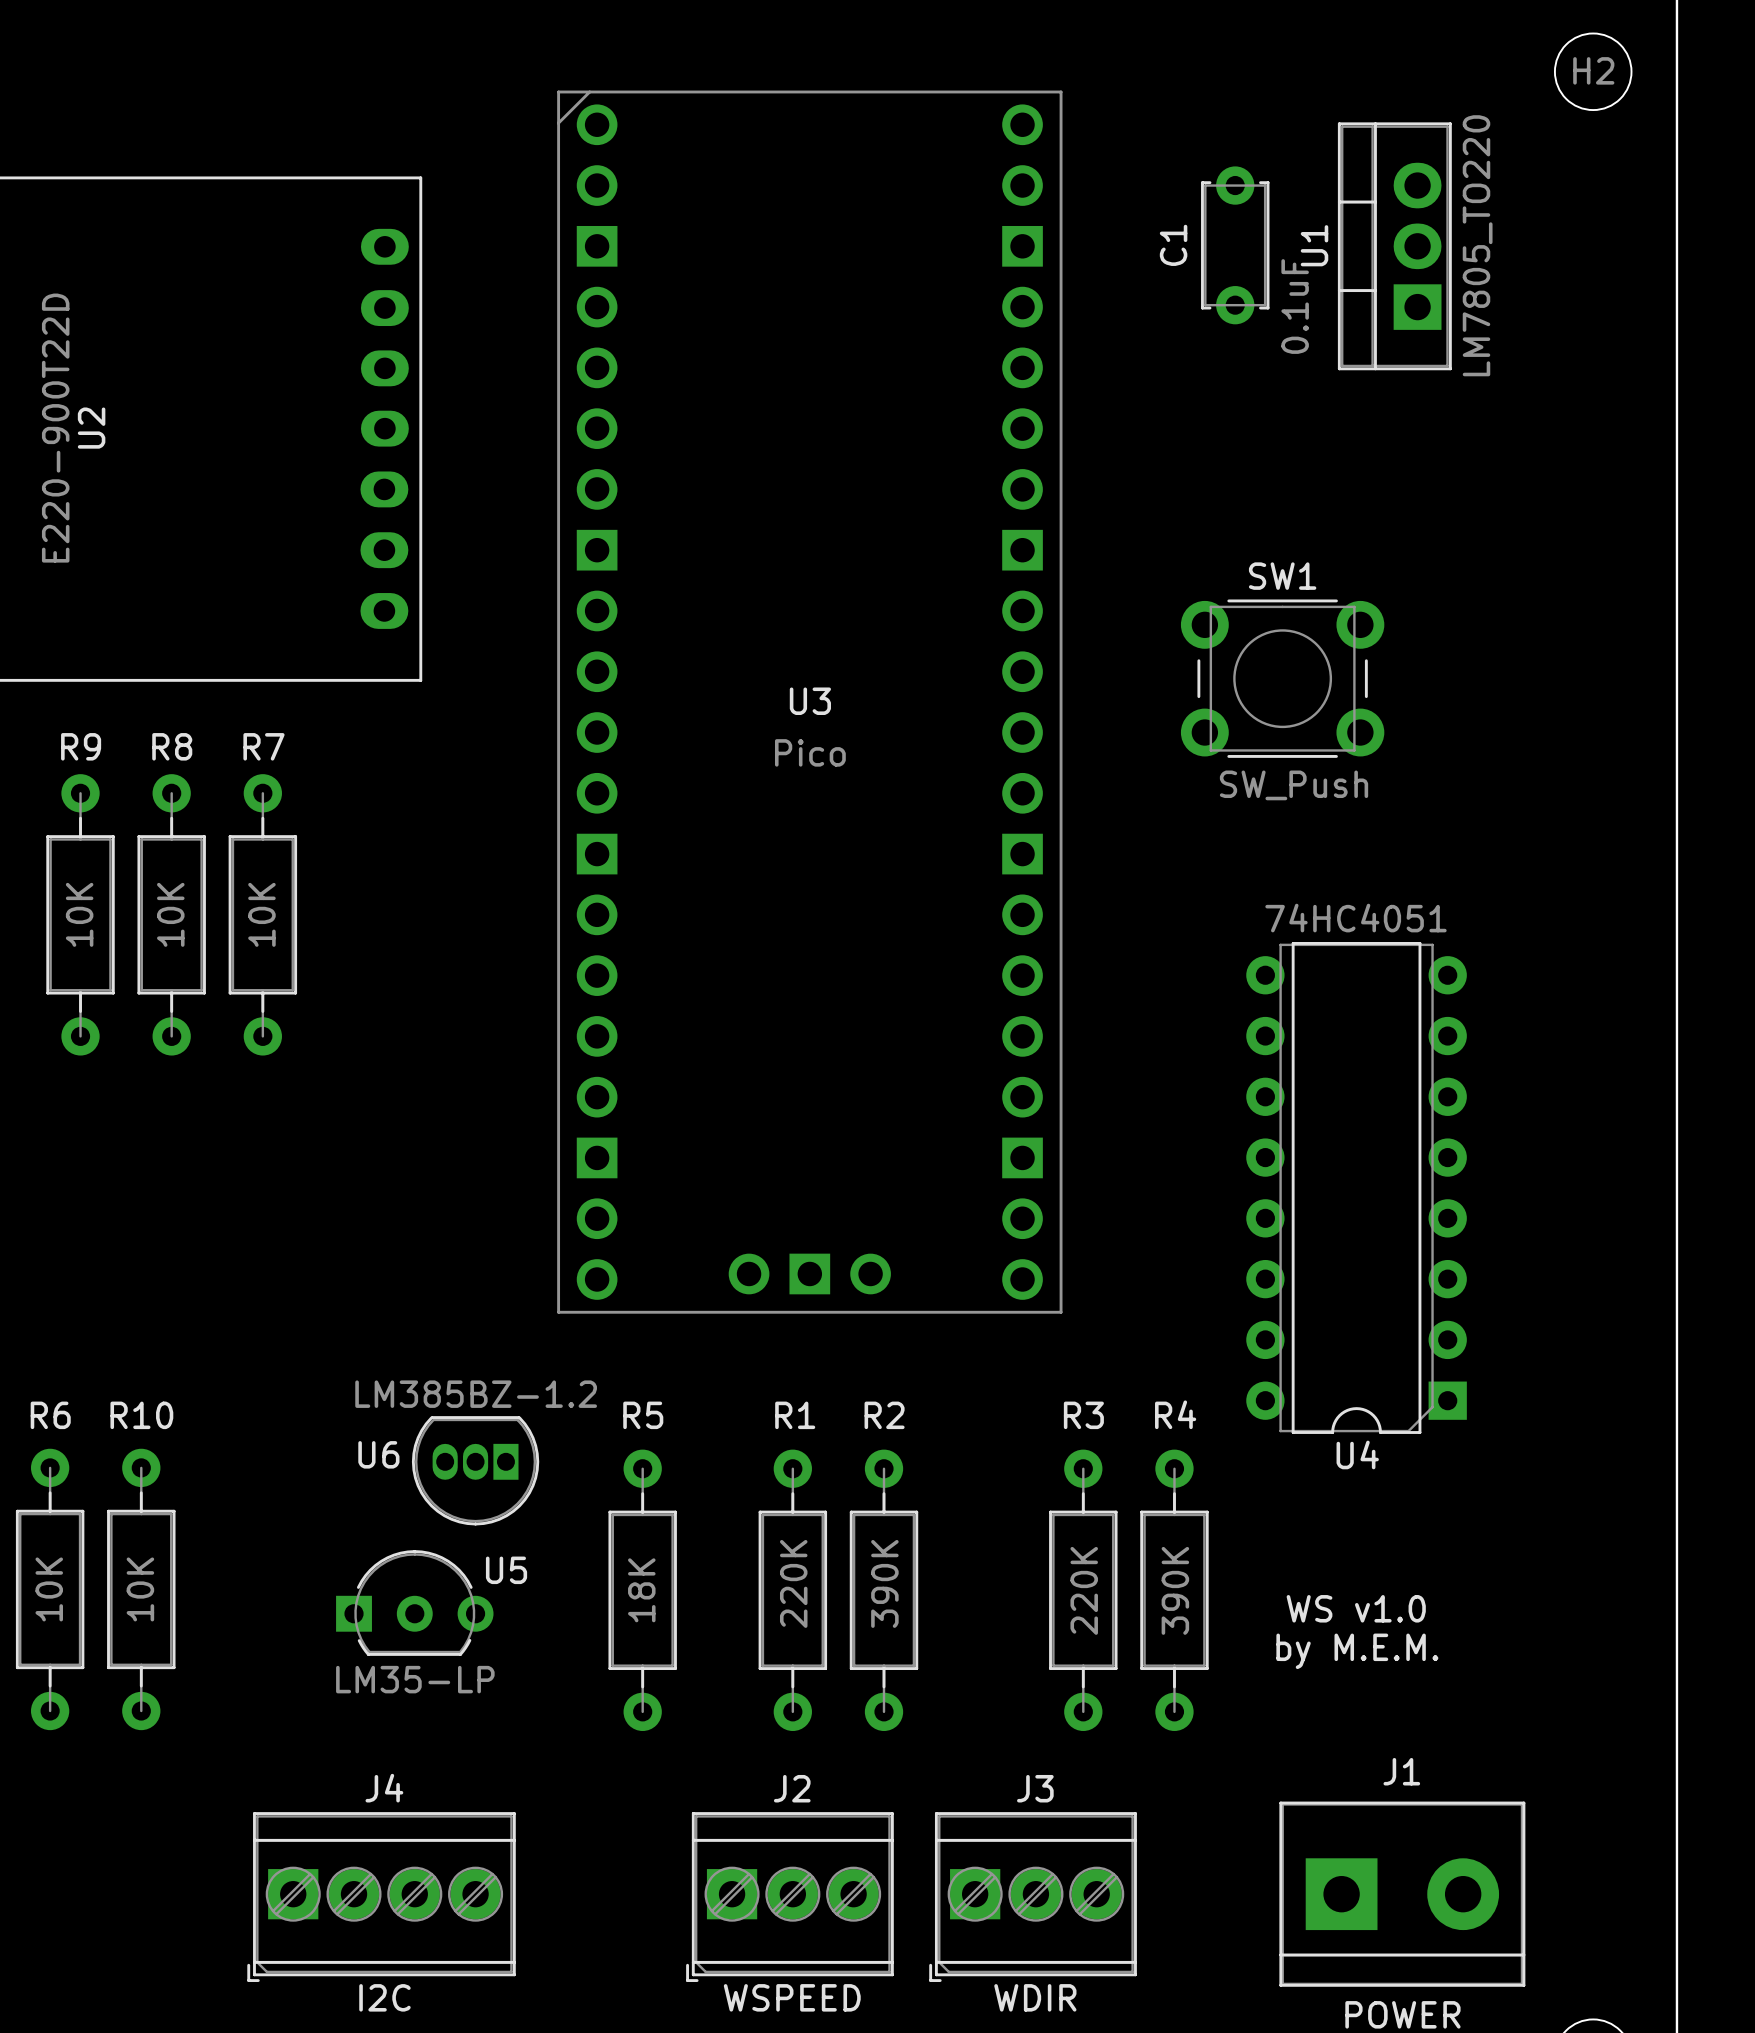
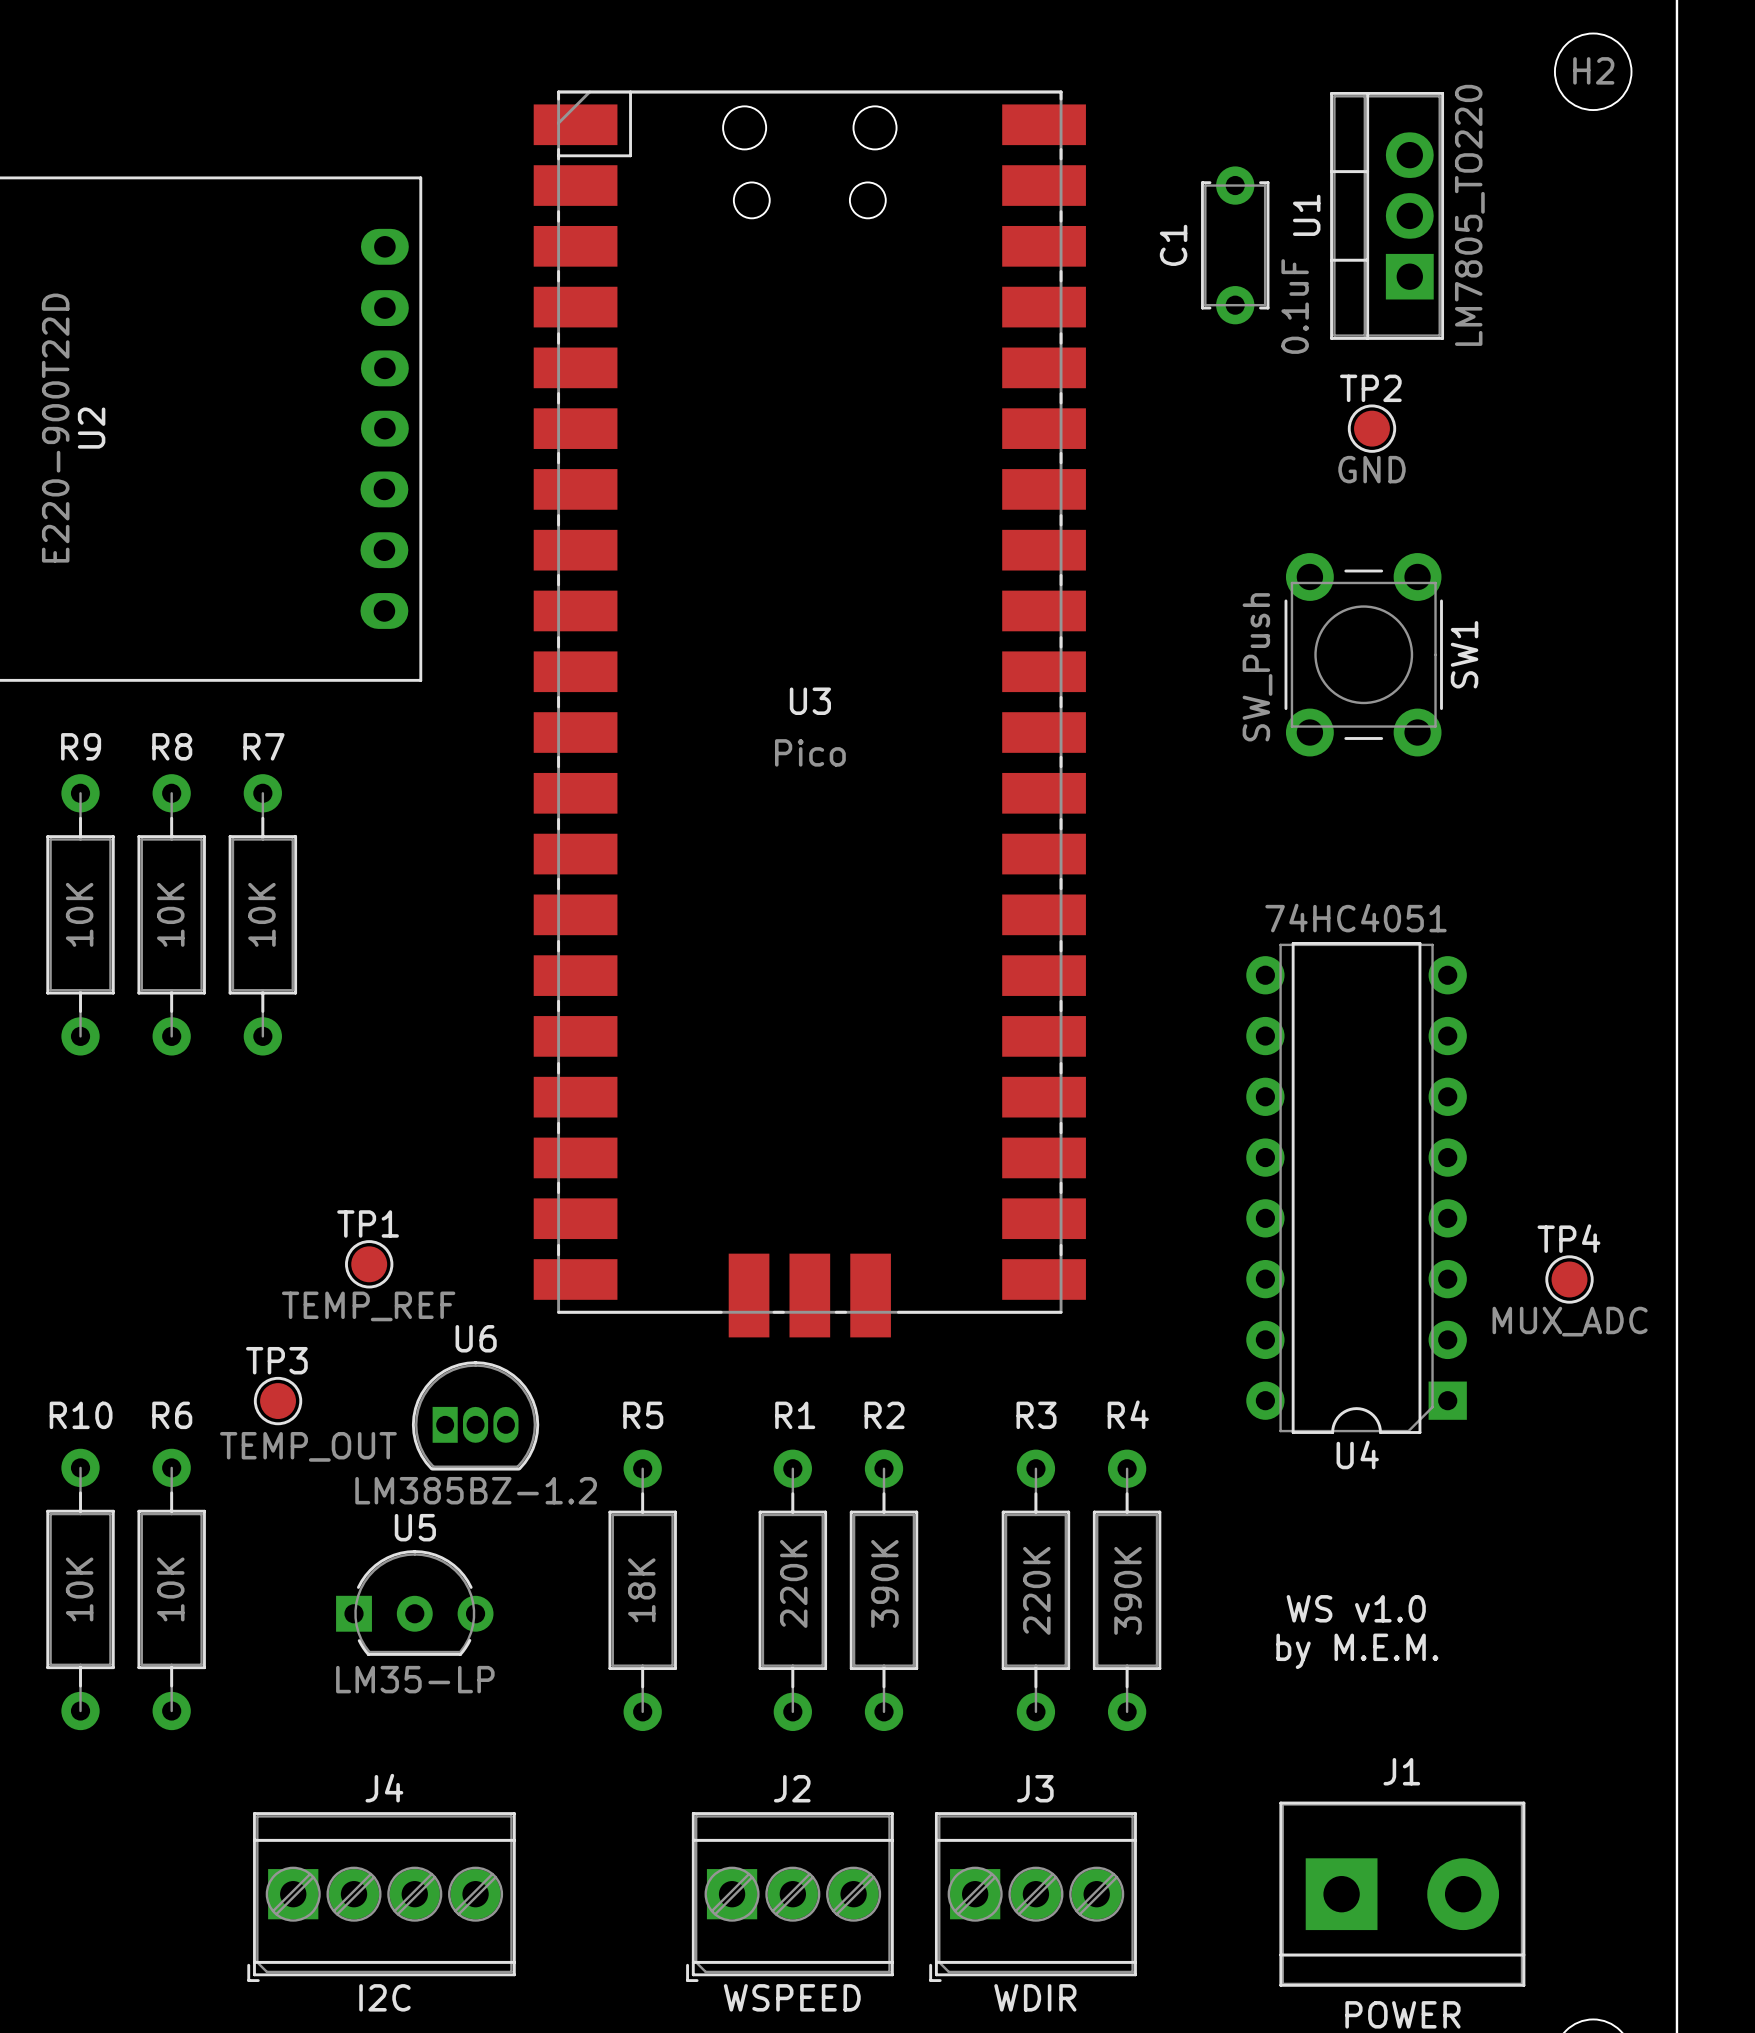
U3 footprint: [557, 90, 1063, 1314] -> [533, 90, 1086, 1338]
U1 position: (1394, 246) -> (1387, 215)
TP2: none -> GND (1371, 428)
SW1 rotation: 0° (1282, 678) -> 90° clockwise (1363, 654)
TP1: none -> TEMP_REF (369, 1264)
TP4: none -> MUX_ADC (1569, 1279)
TP3: none -> TEMP_OUT (278, 1401)
U6 name position: U6 (378, 1454) -> U6 (476, 1338)
U6 rotation: 0° (475, 1470) -> 180° (475, 1415)
U5 name position: U5 (506, 1570) -> U5 (415, 1527)
R6 position: (50, 1589) -> (171, 1589)
R10 position: (141, 1589) -> (80, 1589)
R3 position: (1083, 1590) -> (1035, 1590)
R4 position: (1174, 1590) -> (1127, 1590)

